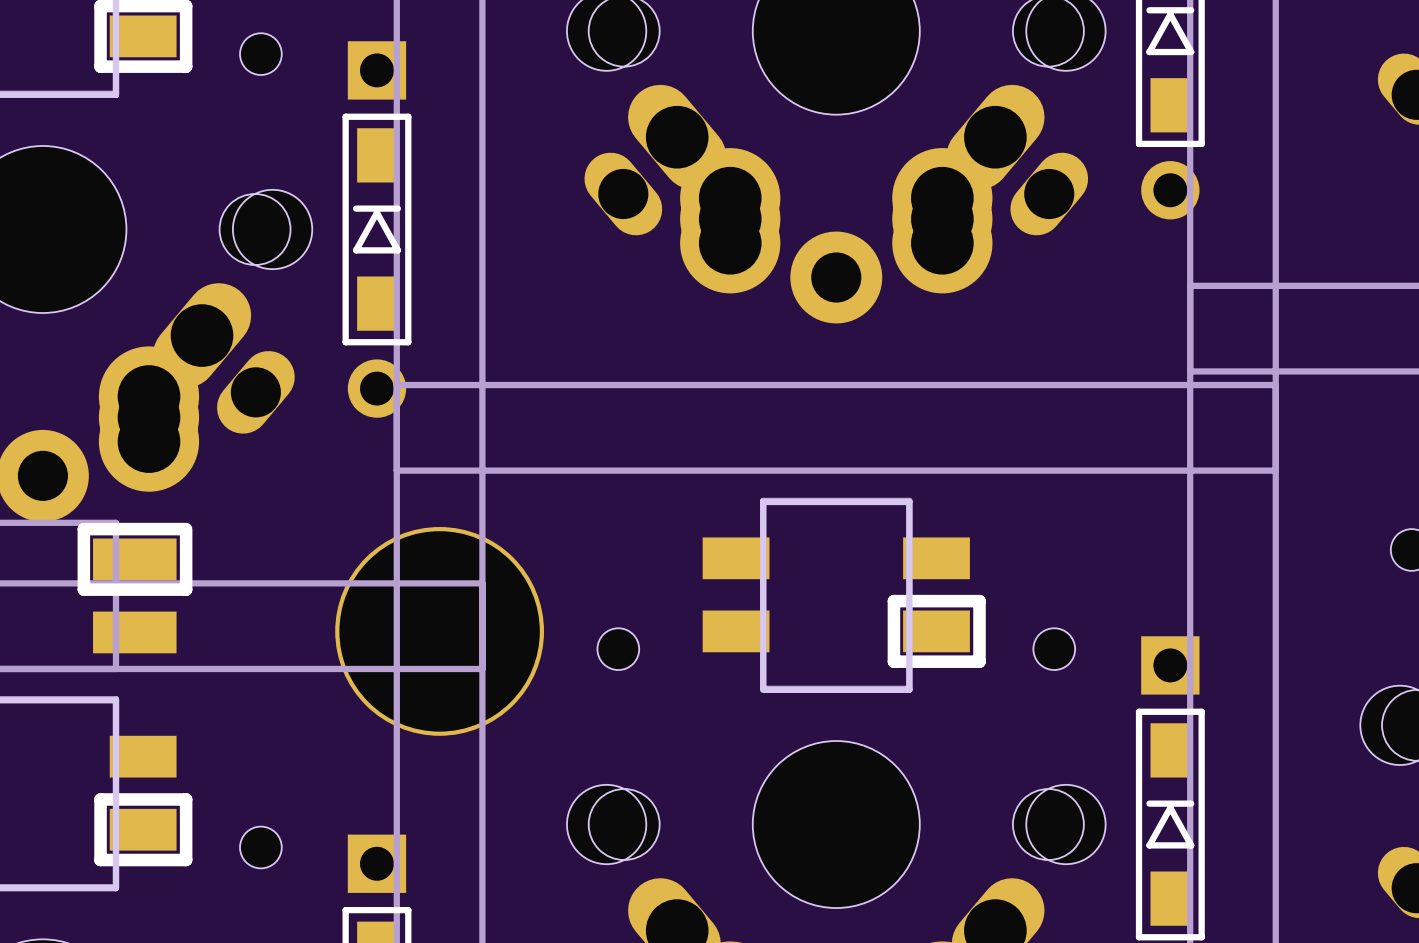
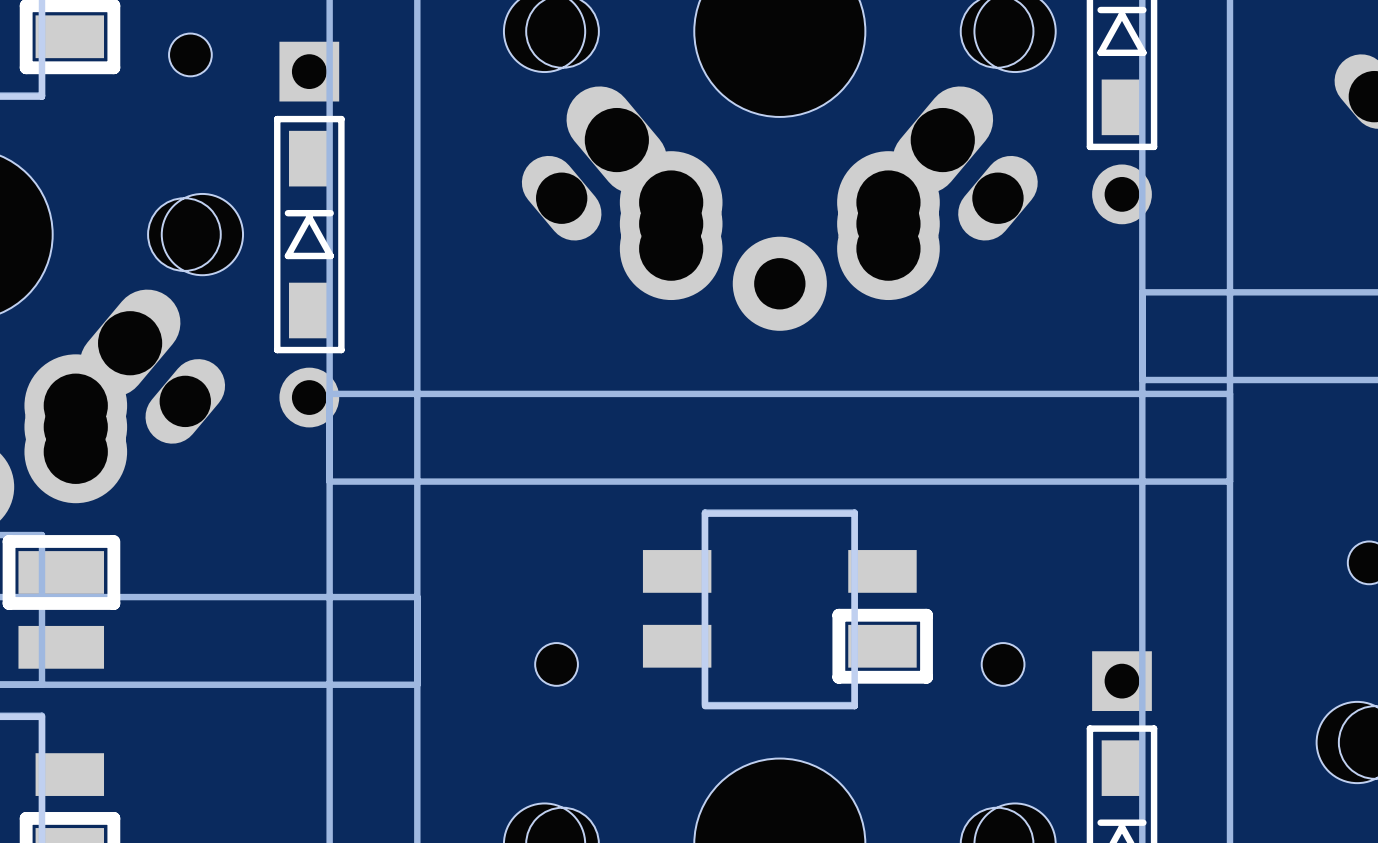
part: (439, 631) -> none

